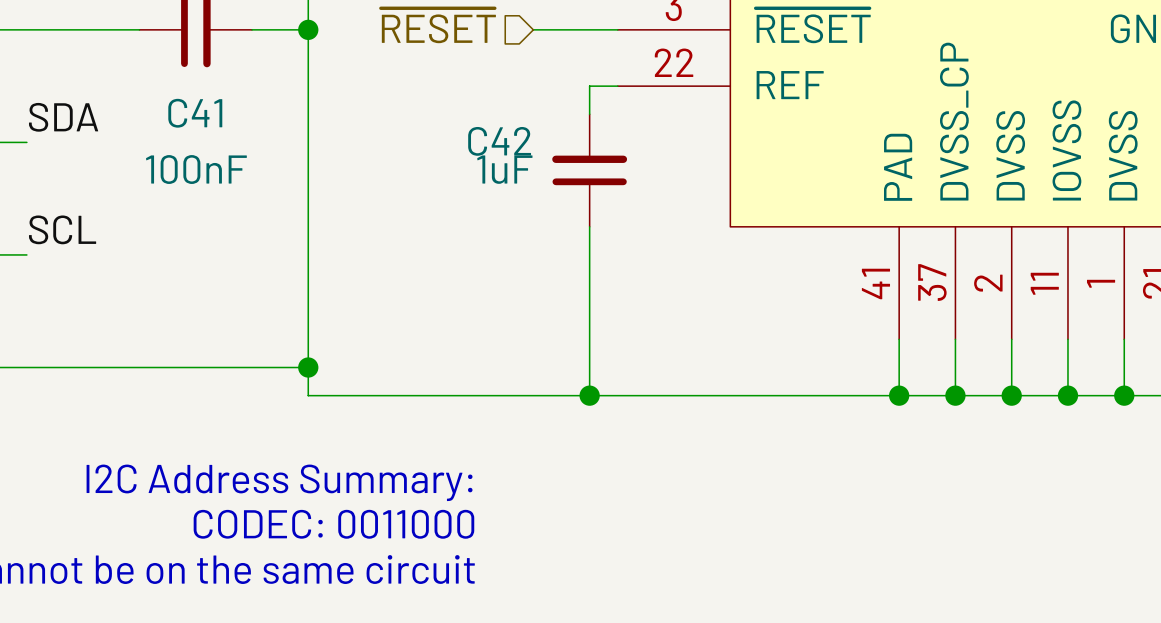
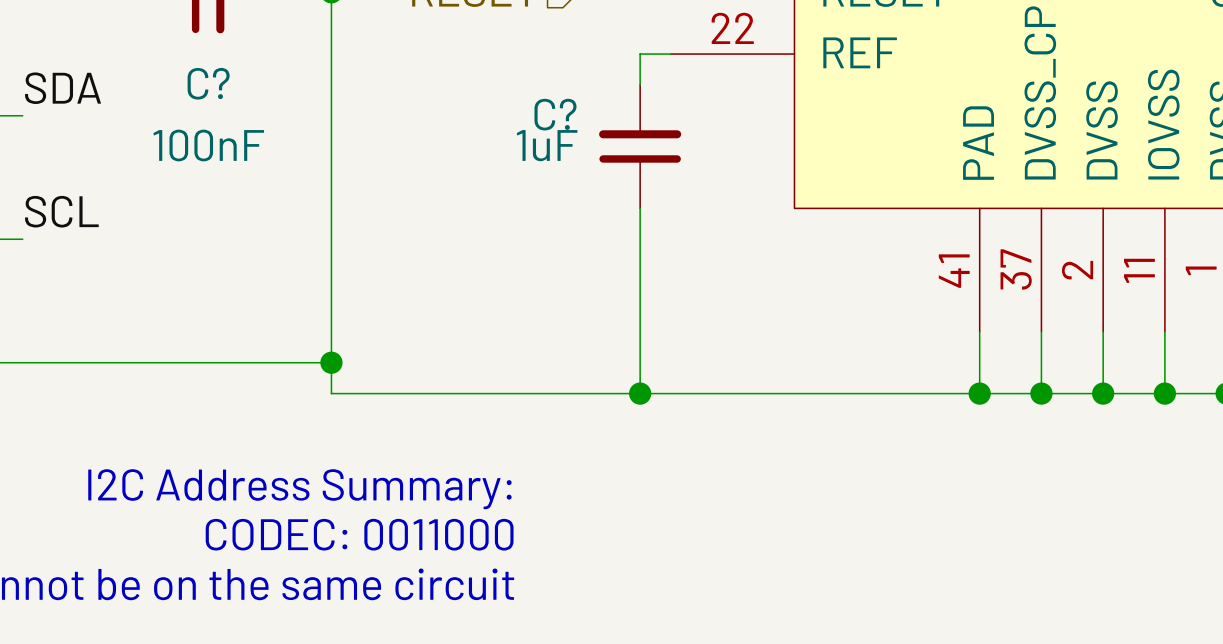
C41 name: C41 (195, 113) -> C? (208, 83)
C42 name: C42 (499, 141) -> C? (555, 114)

